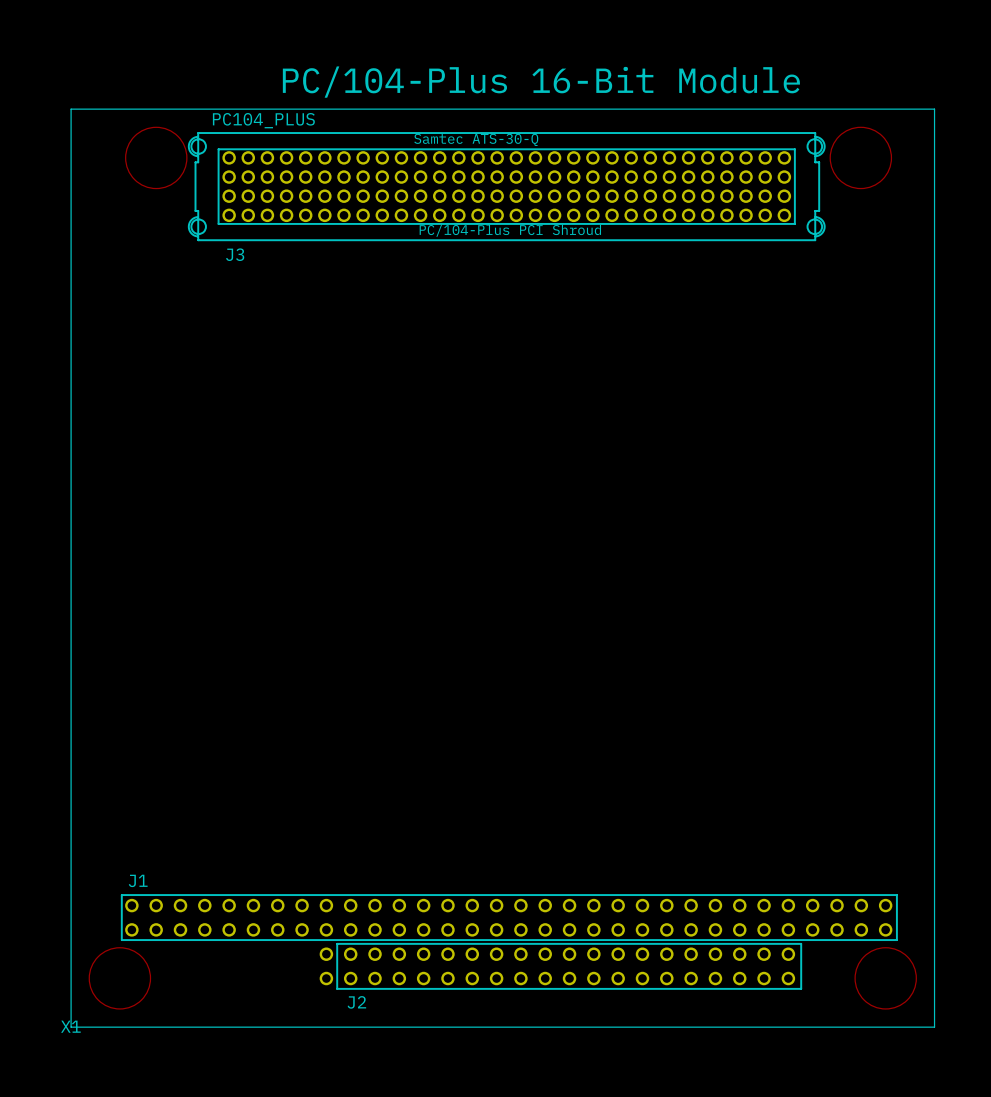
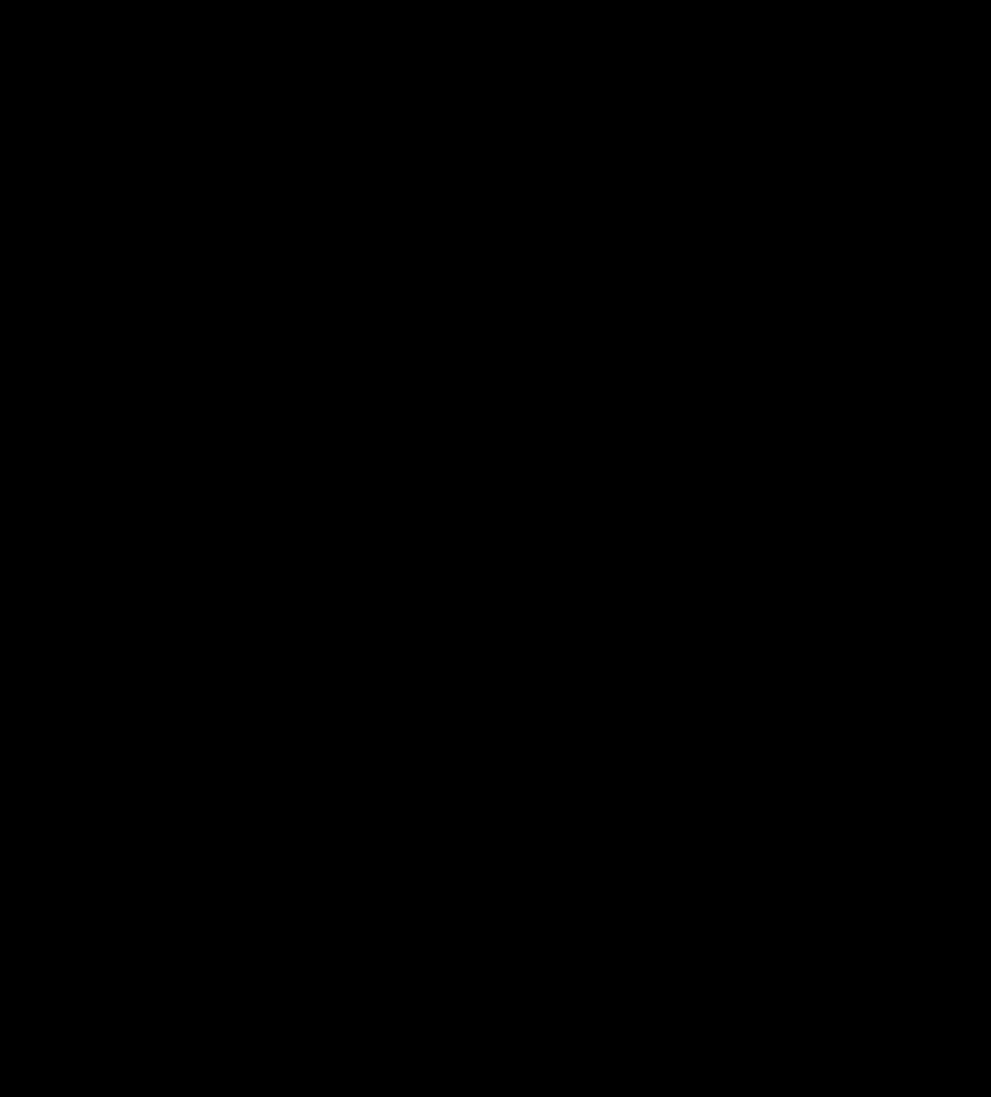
X1: PC104_PLUS (502, 568) -> none

